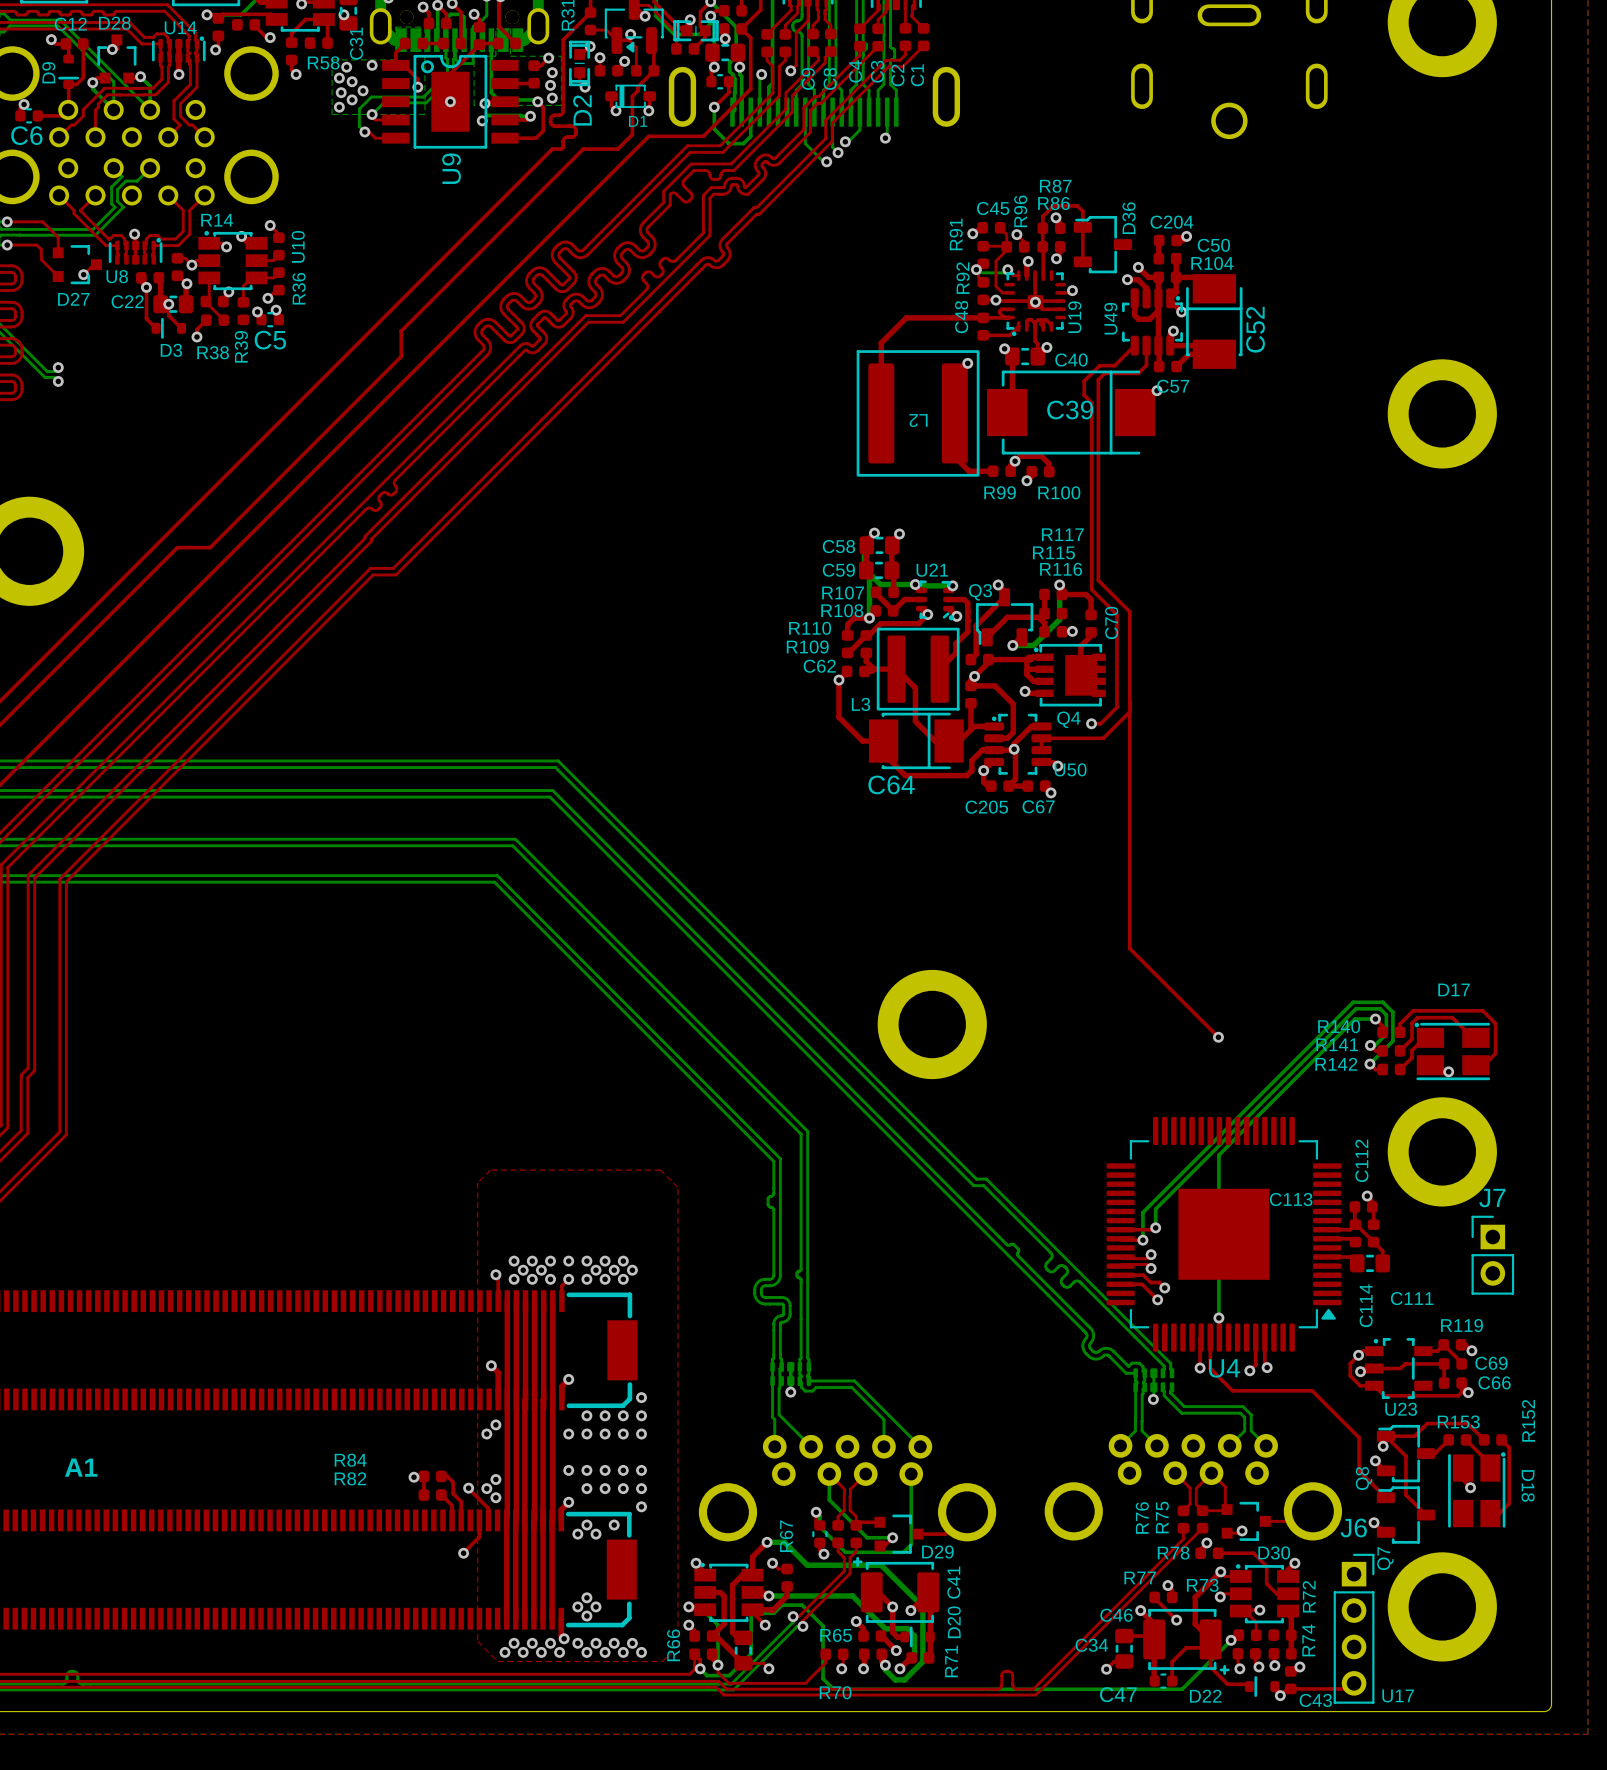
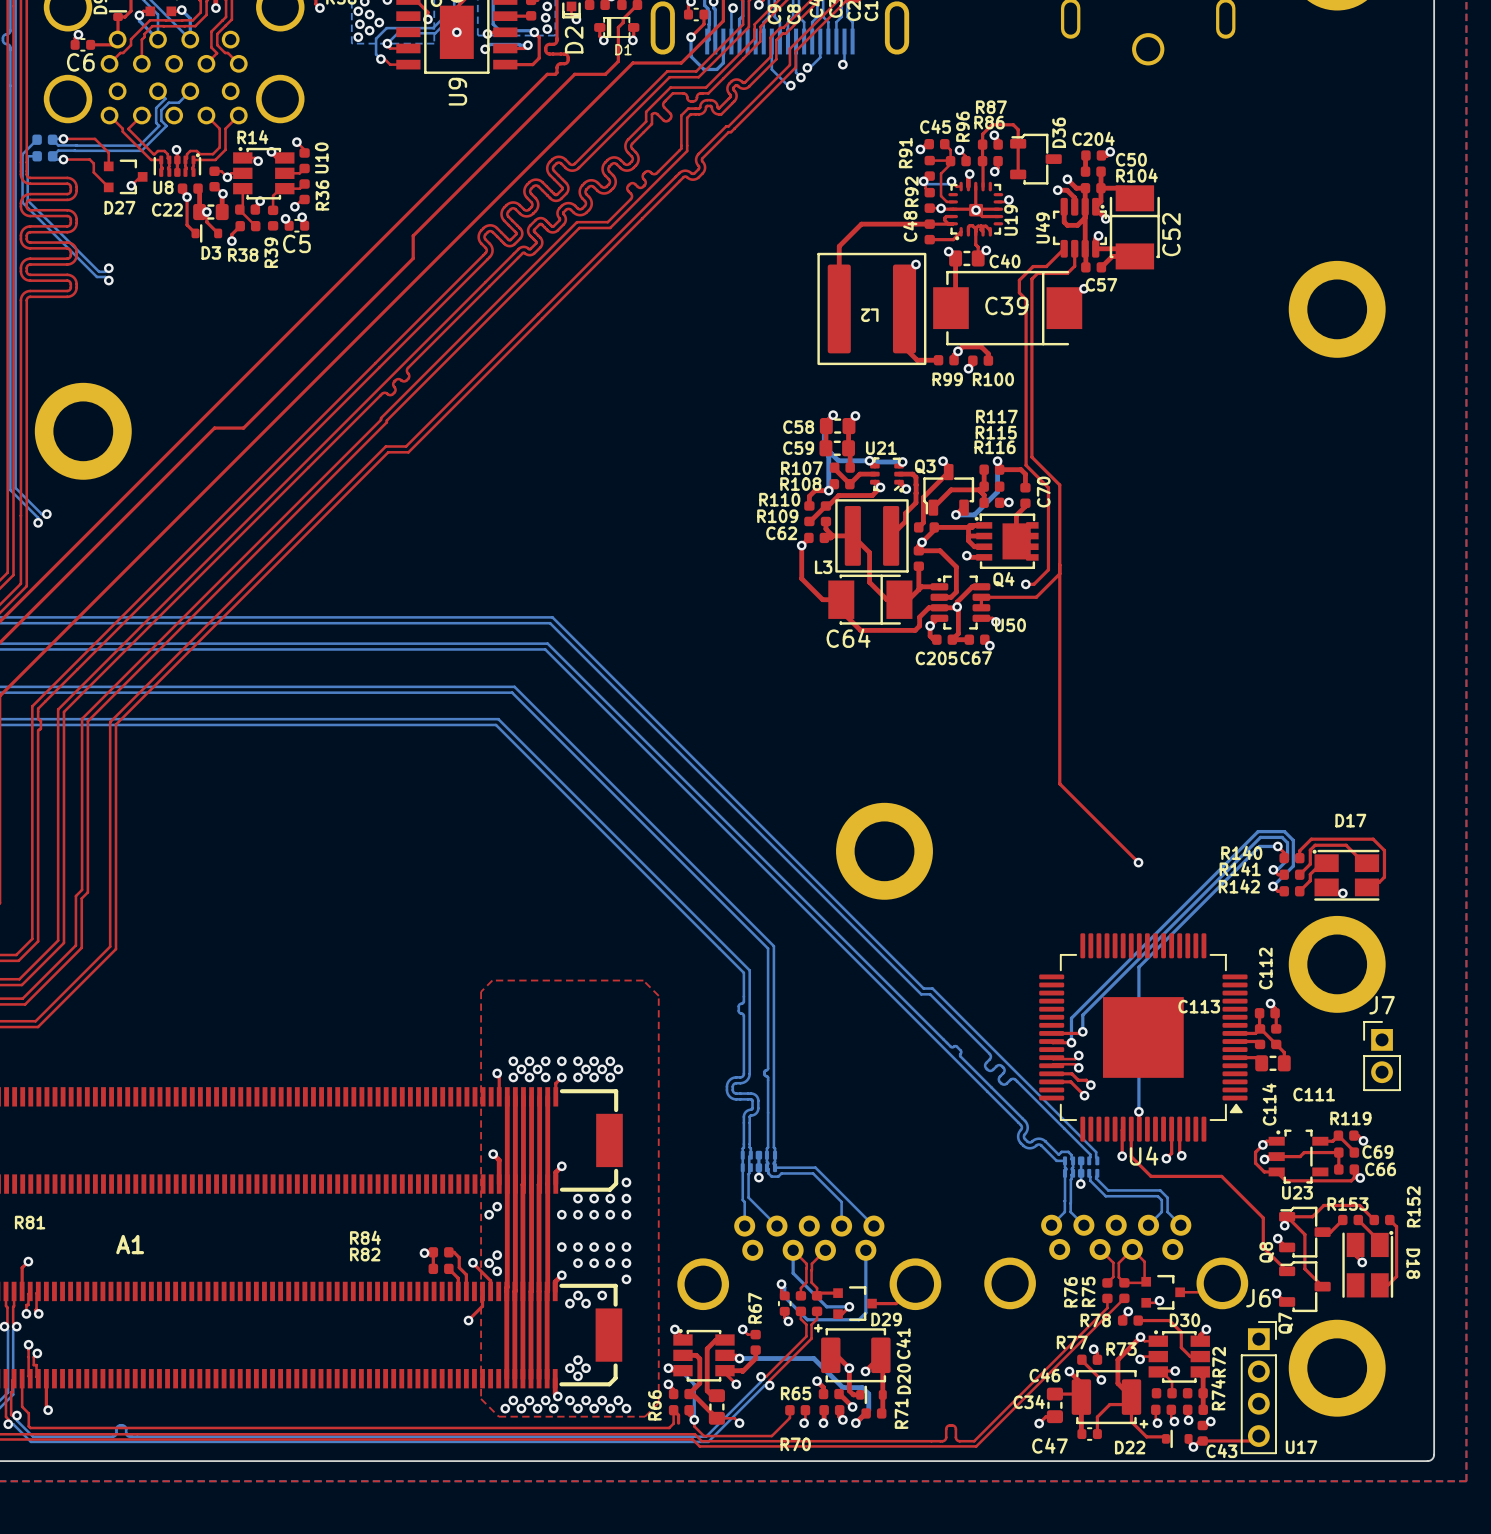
top track: (767, 1542) (752, 1556) (752, 1575) -> none
bottom track: (767, 1542) (784, 1542) (807, 1565) (881, 1565) (922, 1606) (922, 1661) (904, 1679) (895, 1679) (885, 1669) (885, 1665) -> none
via: (767, 1542) -> none
bottom track: (1231, 1640) (1182, 1689) (833, 1689) (823, 1678) (823, 1626) (802, 1605) (782, 1605) (773, 1613) (751, 1613) (751, 1653) (729, 1675) (707, 1675) (700, 1668) -> none
via: (1231, 1640) -> none
via: (700, 1668) -> none

